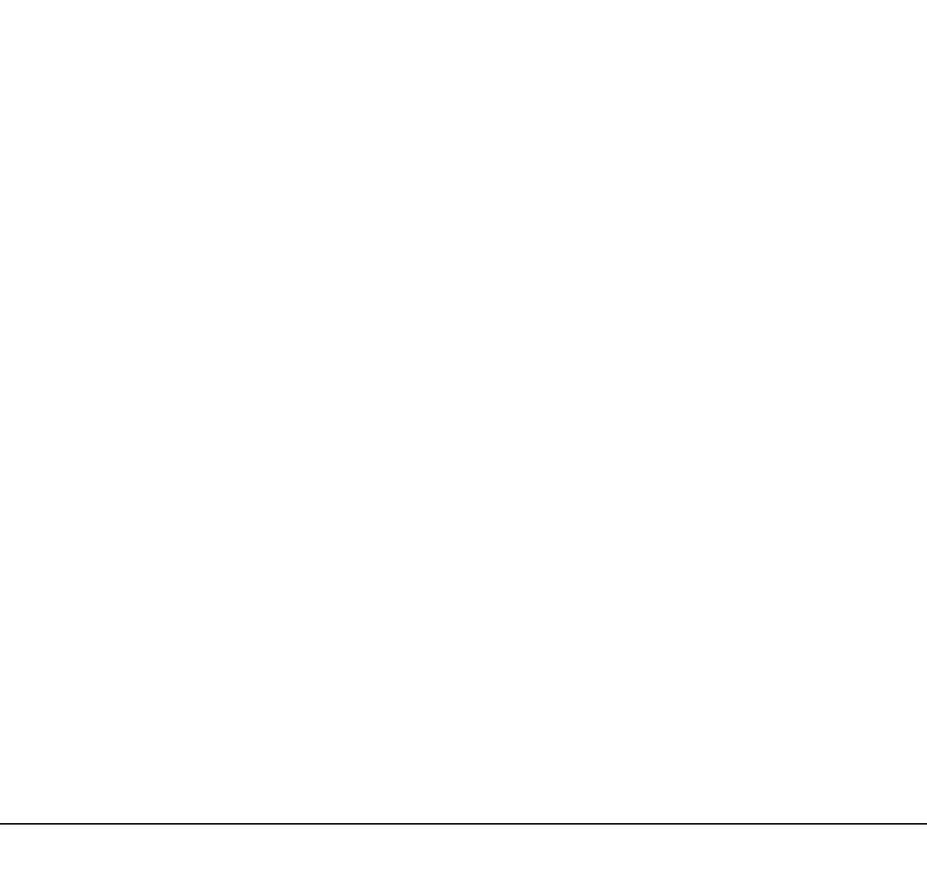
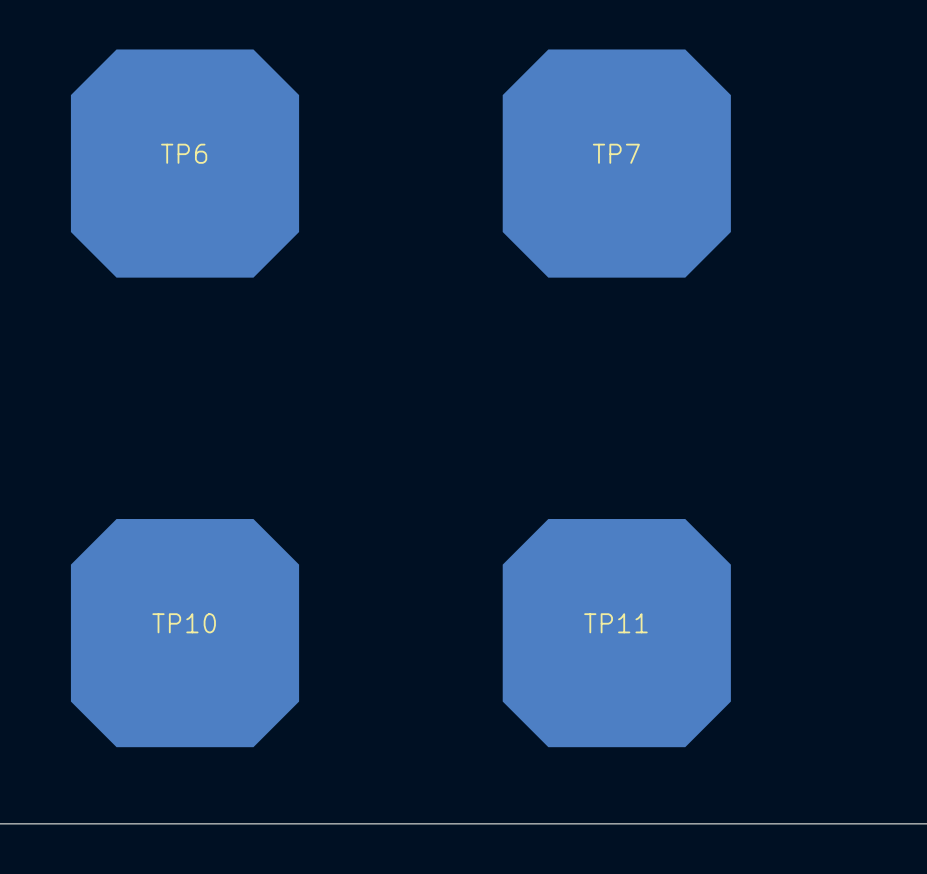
TP6: none -> (185, 163)
TP7: none -> (616, 163)
TP10: none -> (185, 633)
TP11: none -> (616, 633)

